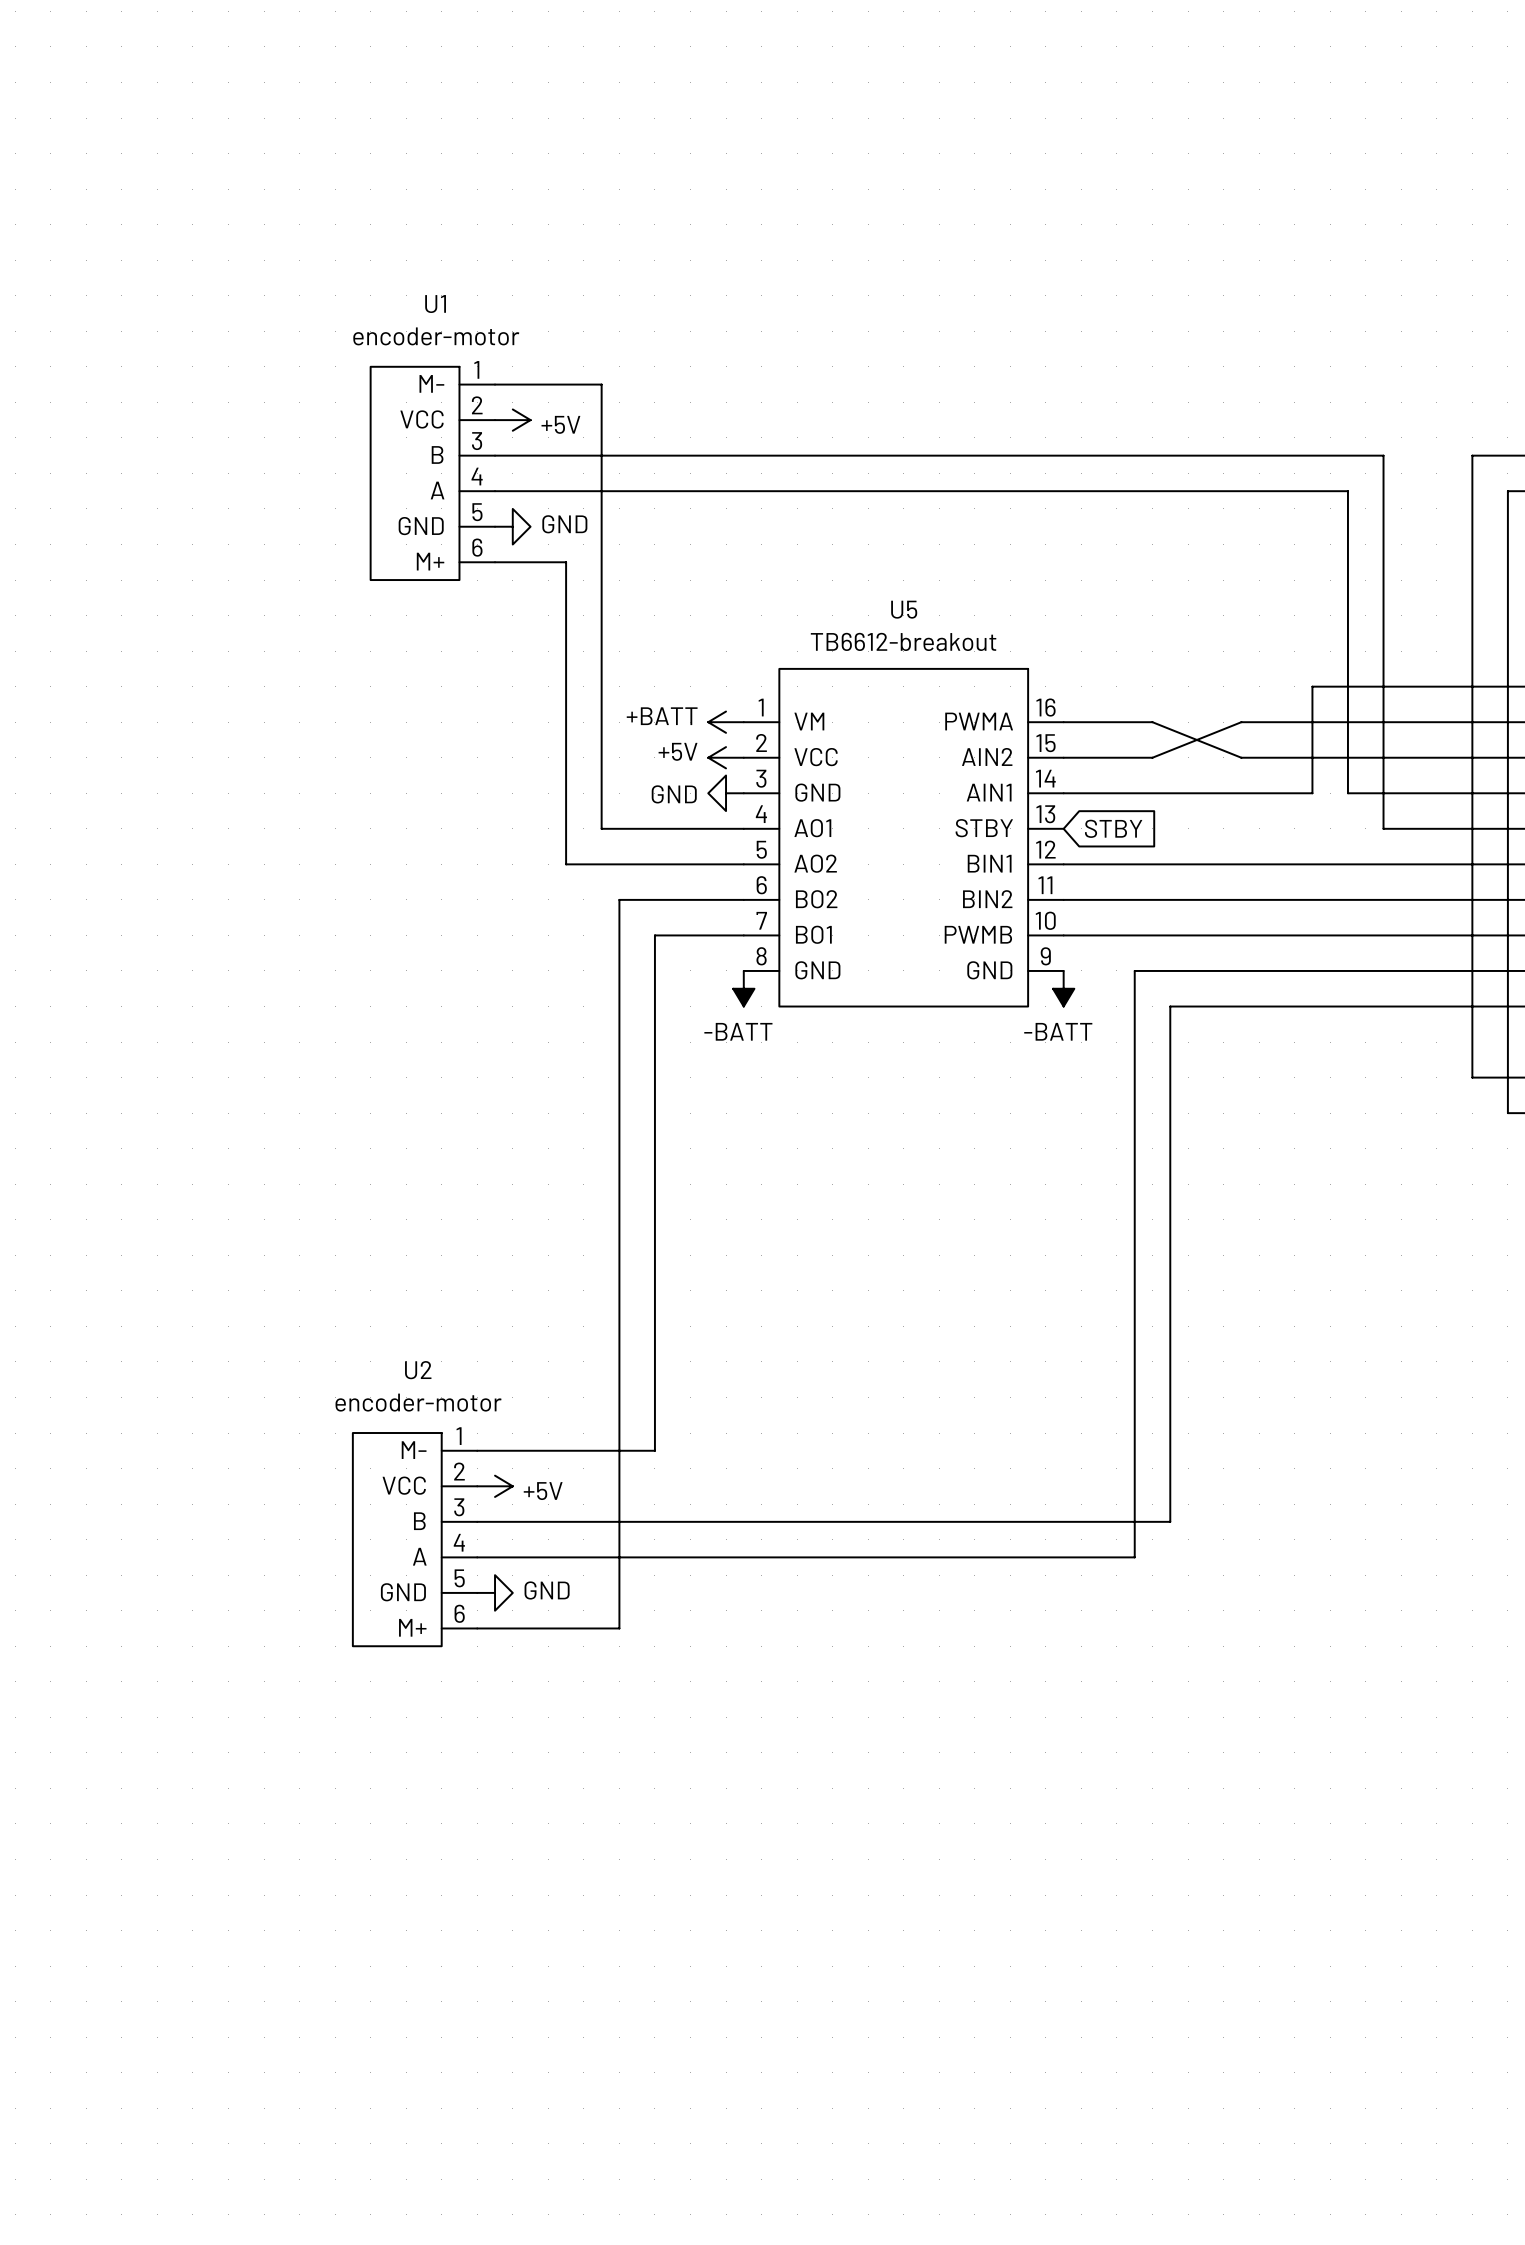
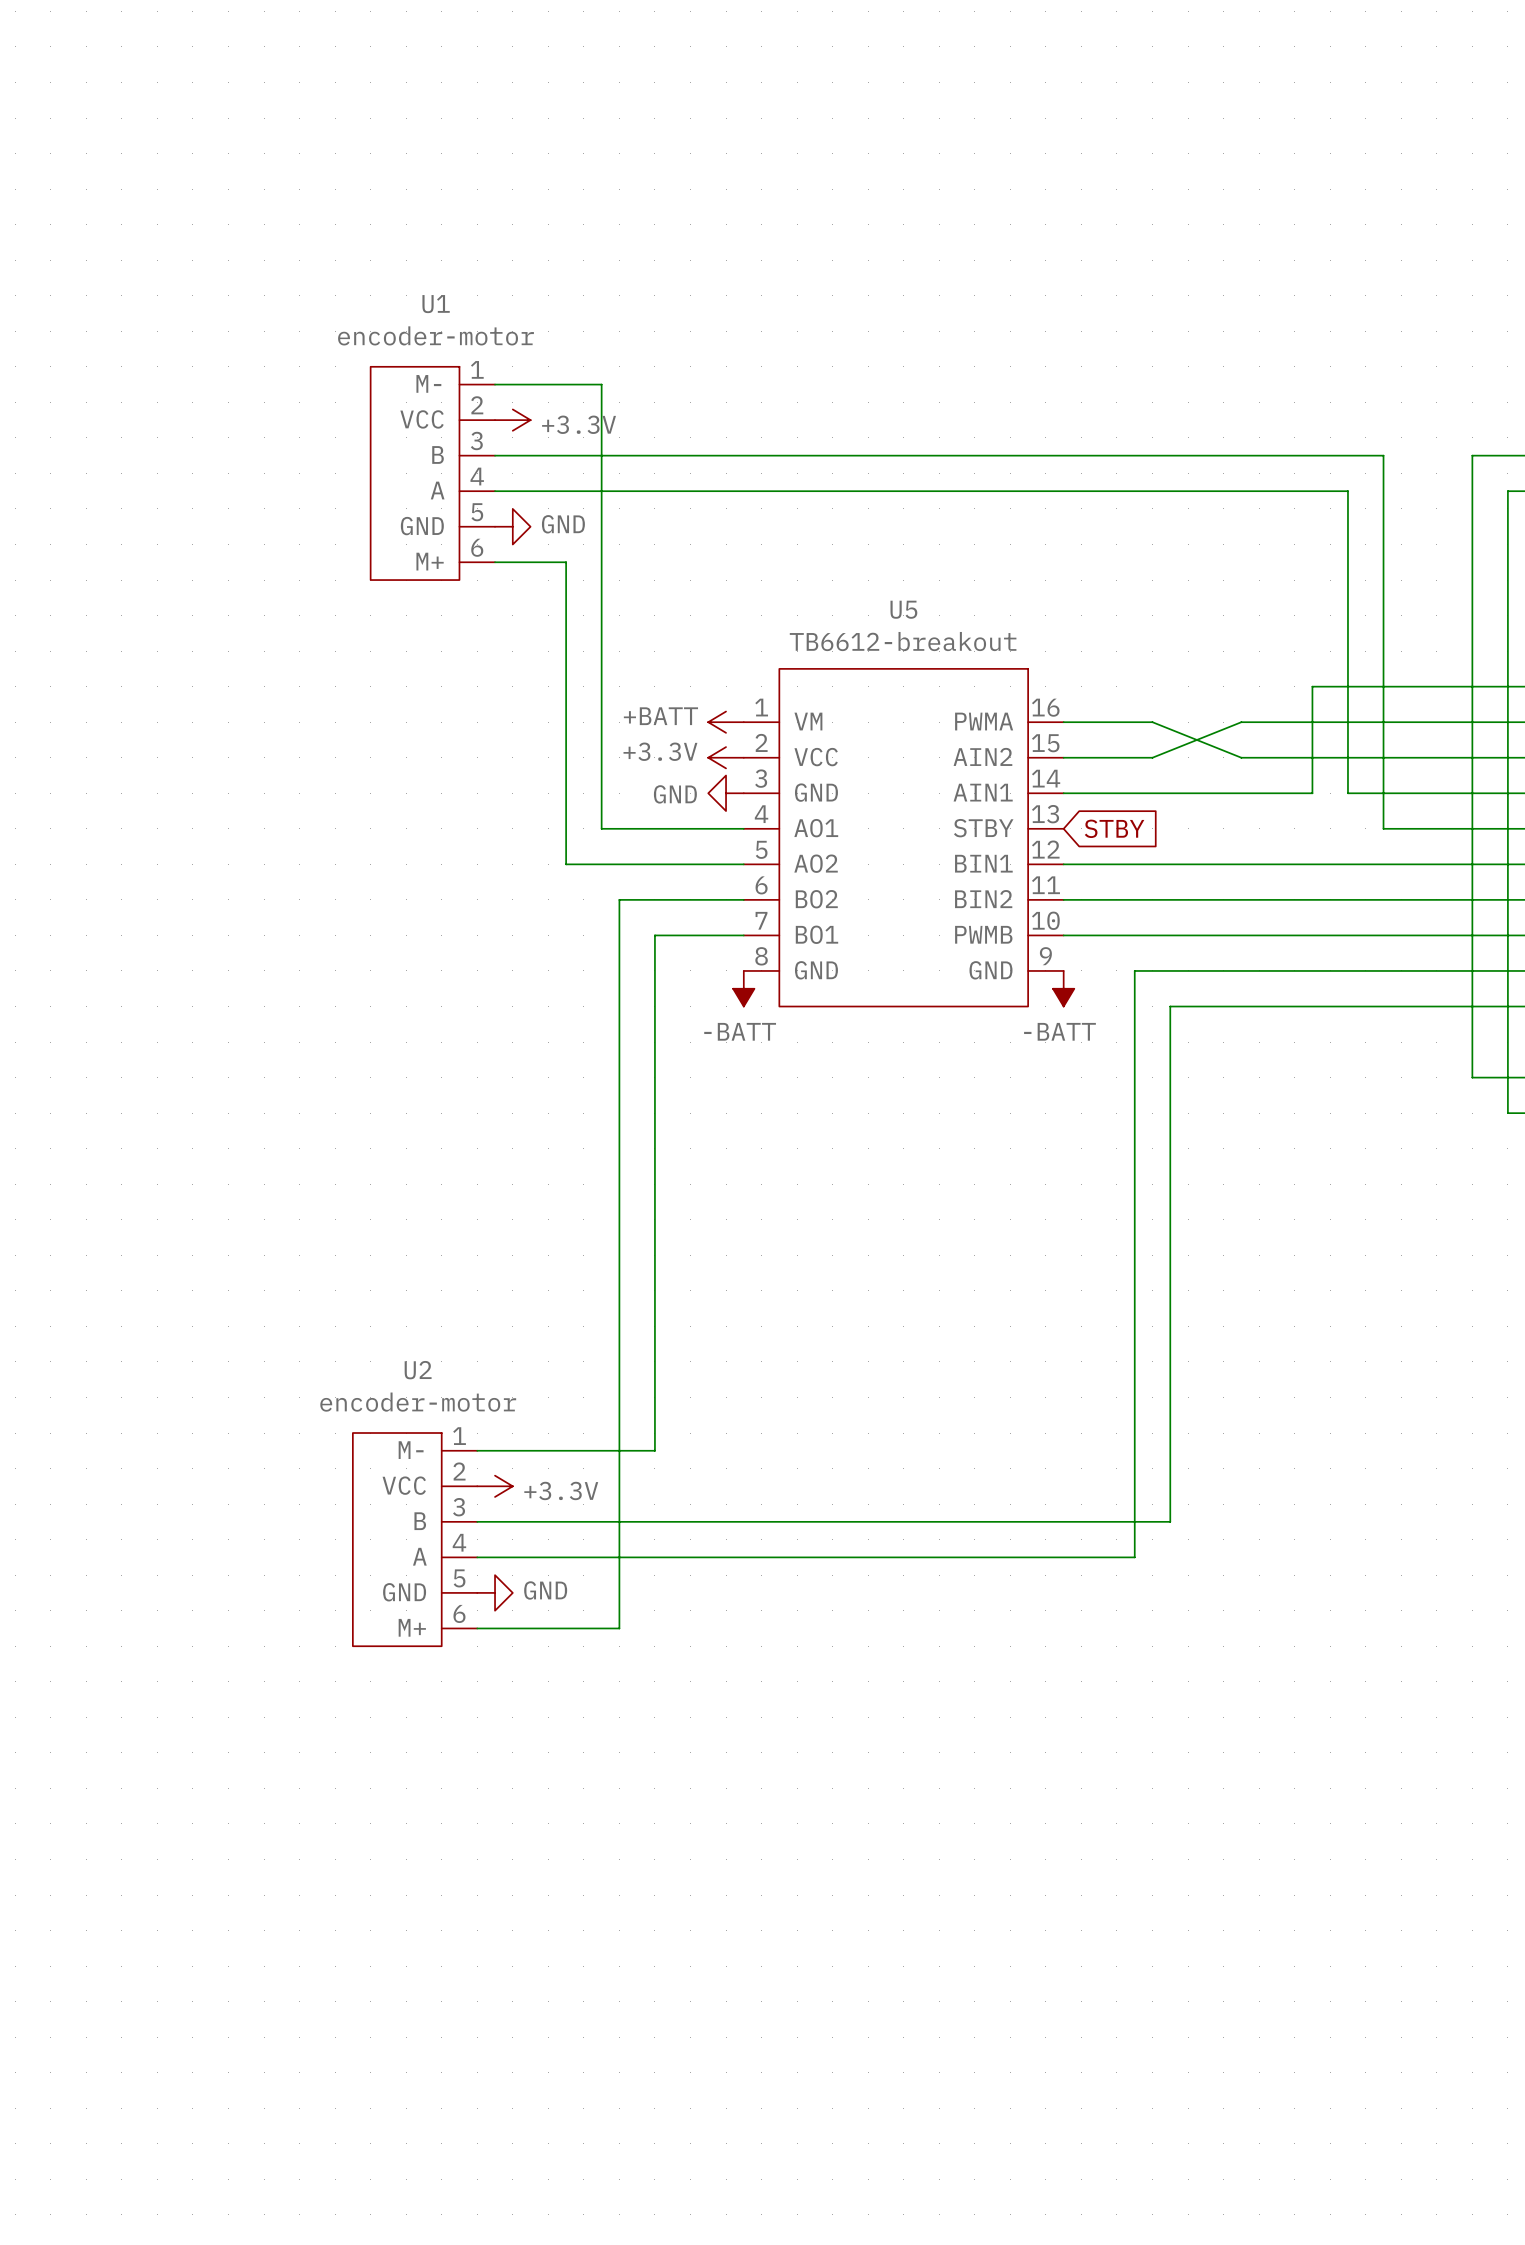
power symbol: +5V (512, 420) -> +3.3V (512, 420)
power symbol: +5V (726, 757) -> +3.3V (726, 757)
power symbol: +5V (495, 1486) -> +3.3V (495, 1486)

